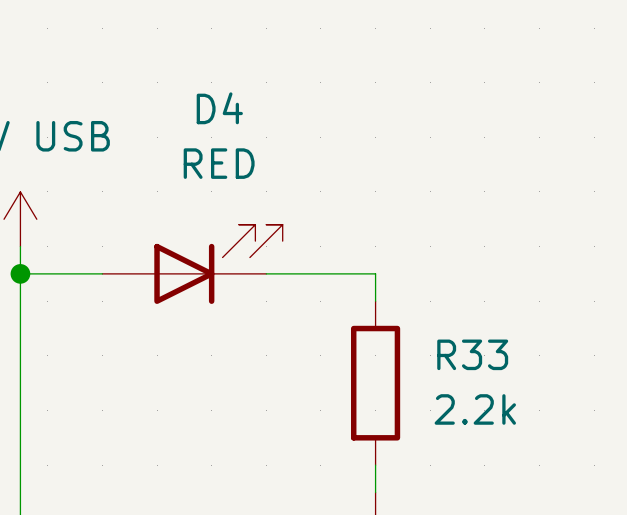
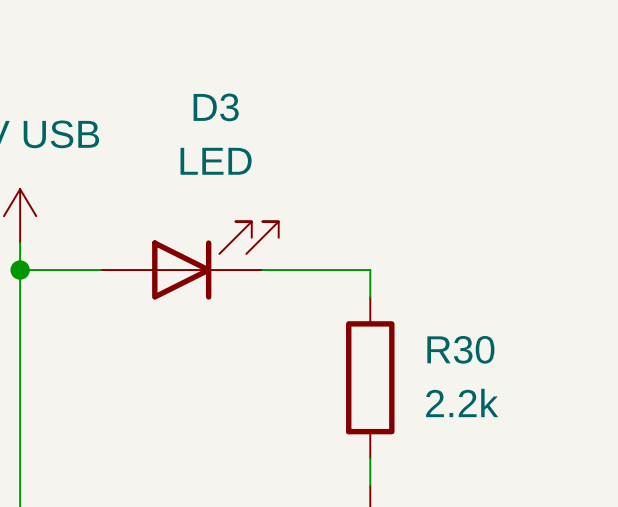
D4 name: D4 (219, 108) -> D3 (216, 107)
D4 value: RED (219, 163) -> LED (216, 161)
R33 name: R33 (472, 354) -> R30 (460, 349)

